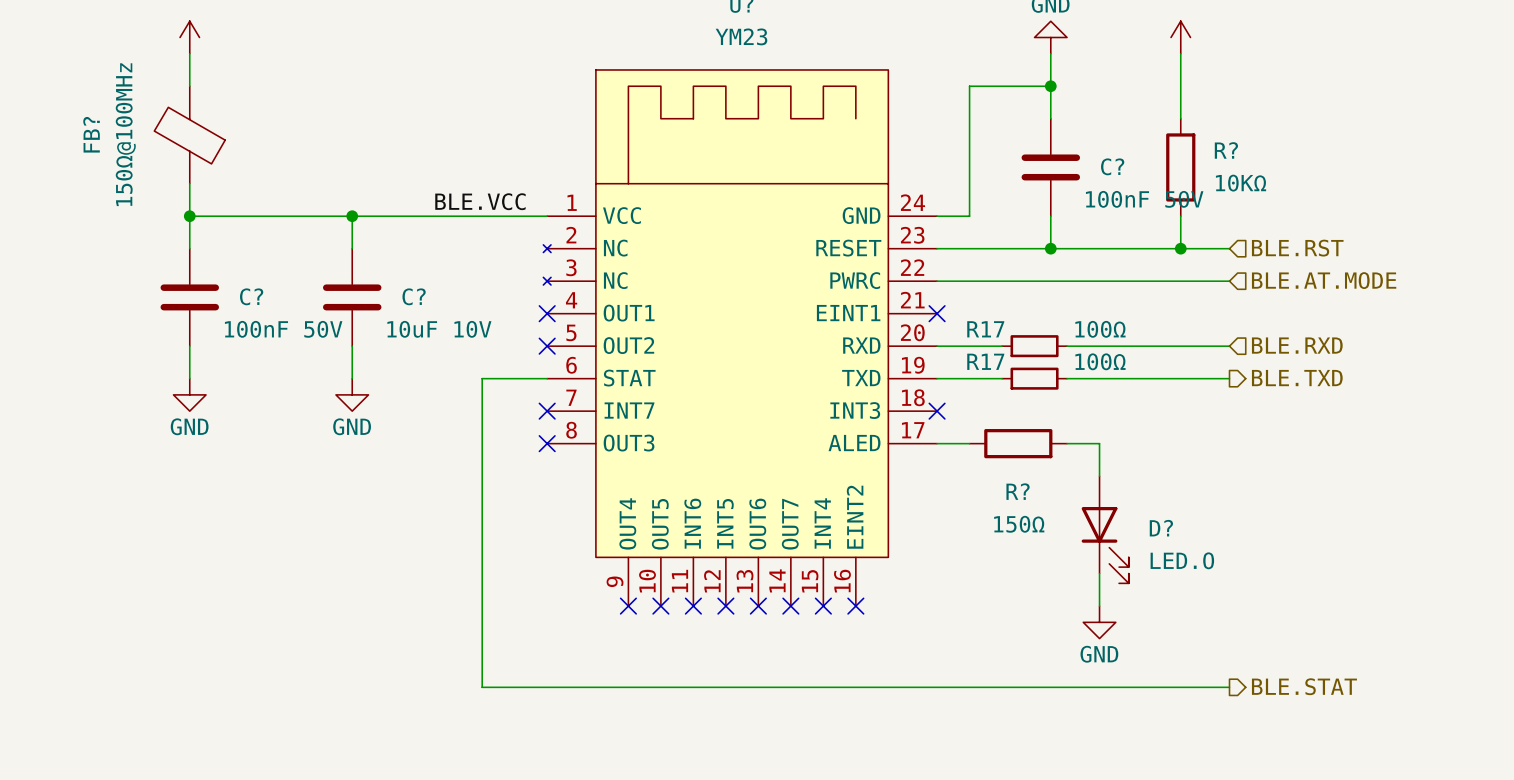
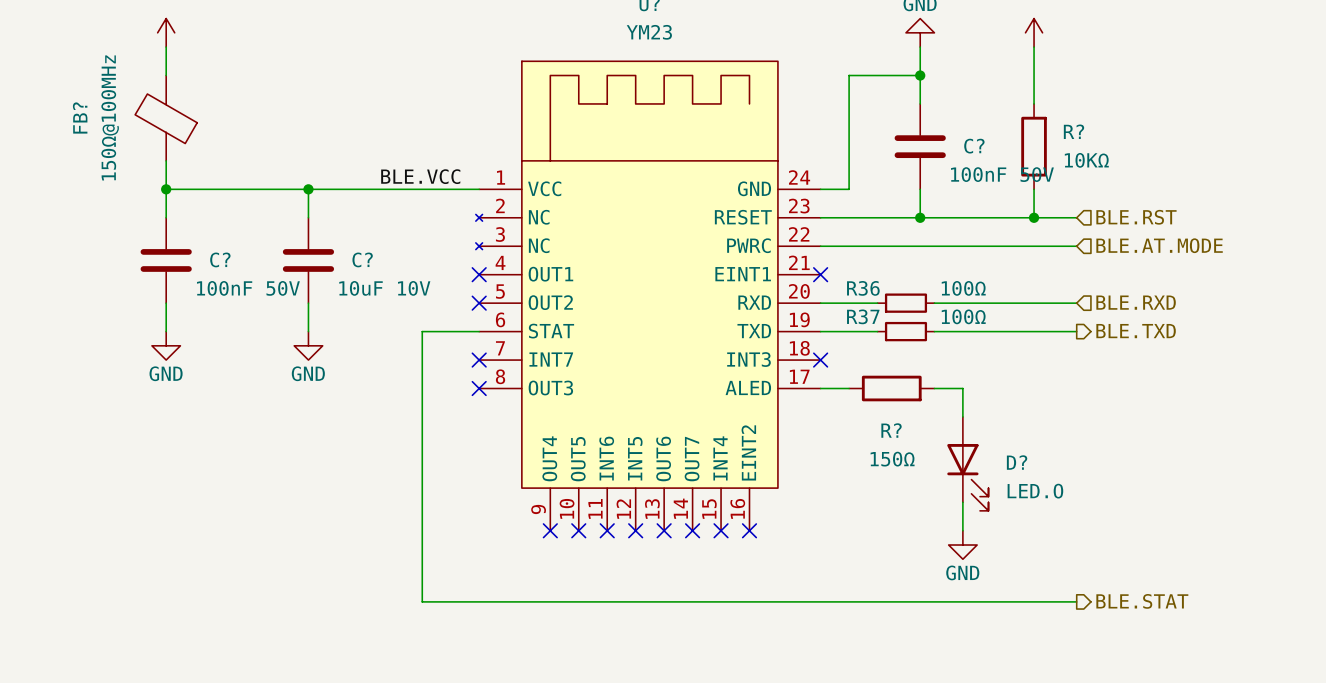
R17 name: R17 (985, 329) -> R36 (863, 288)
R17 name: R17 (985, 361) -> R37 (863, 316)

